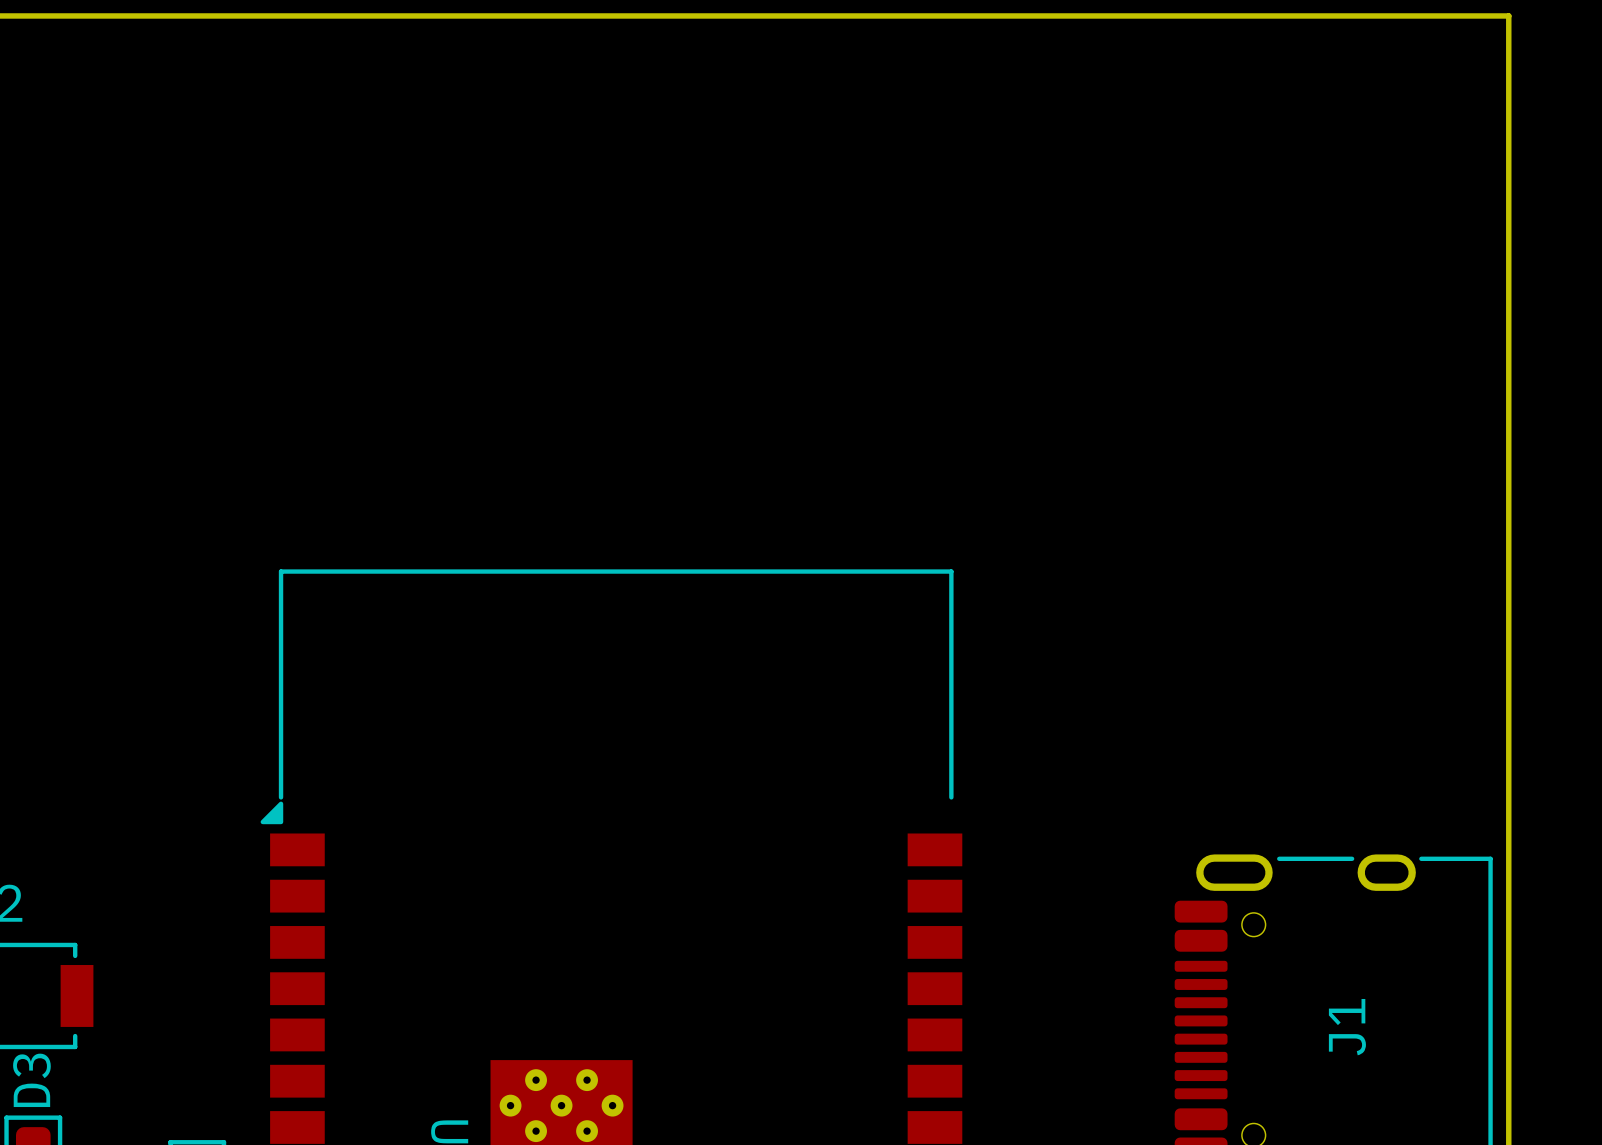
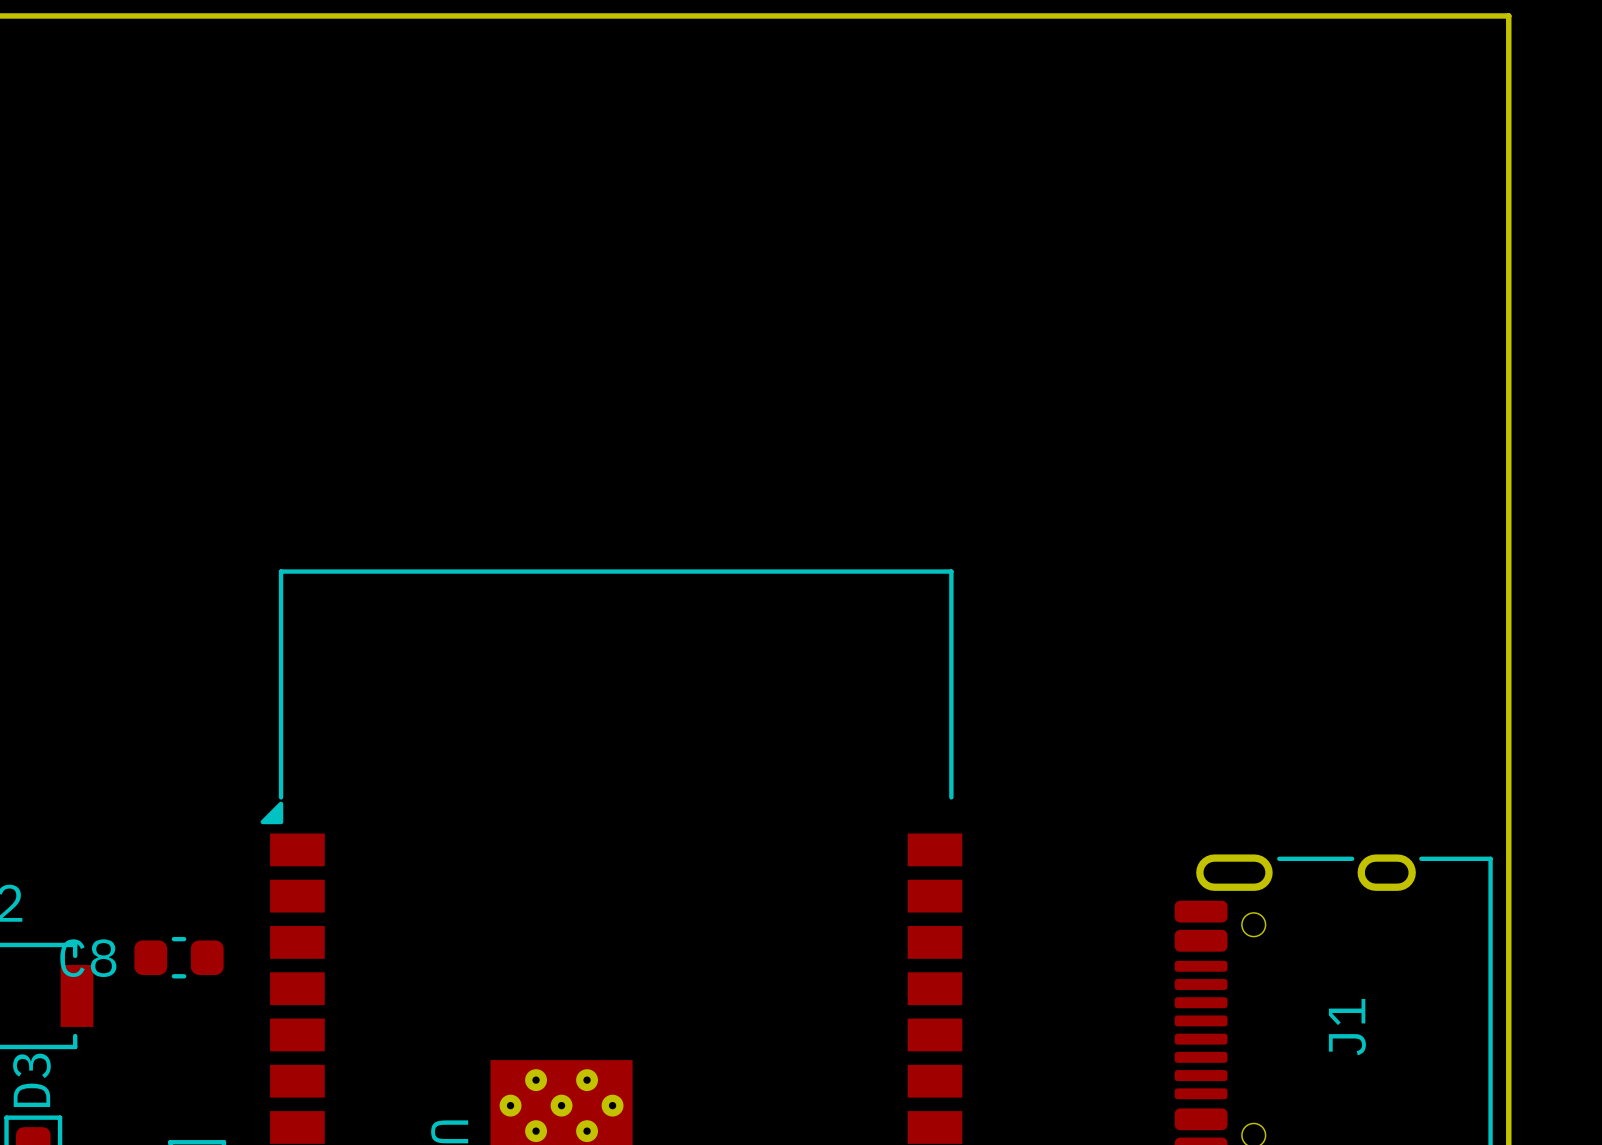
C8: none -> (179, 957)

